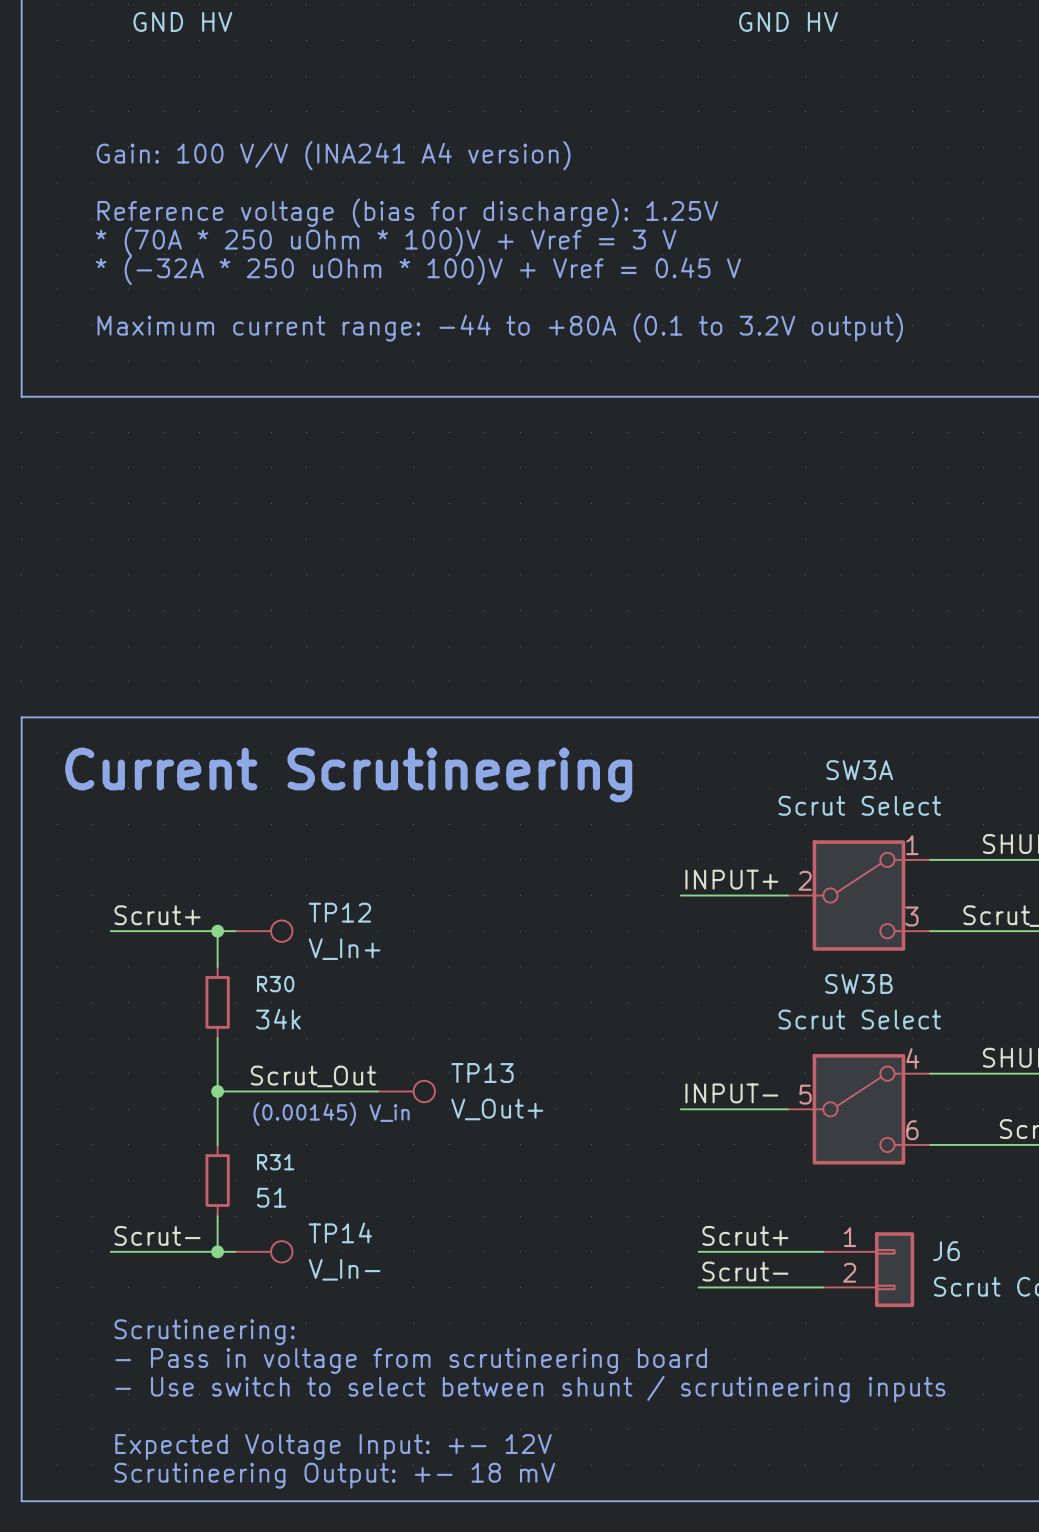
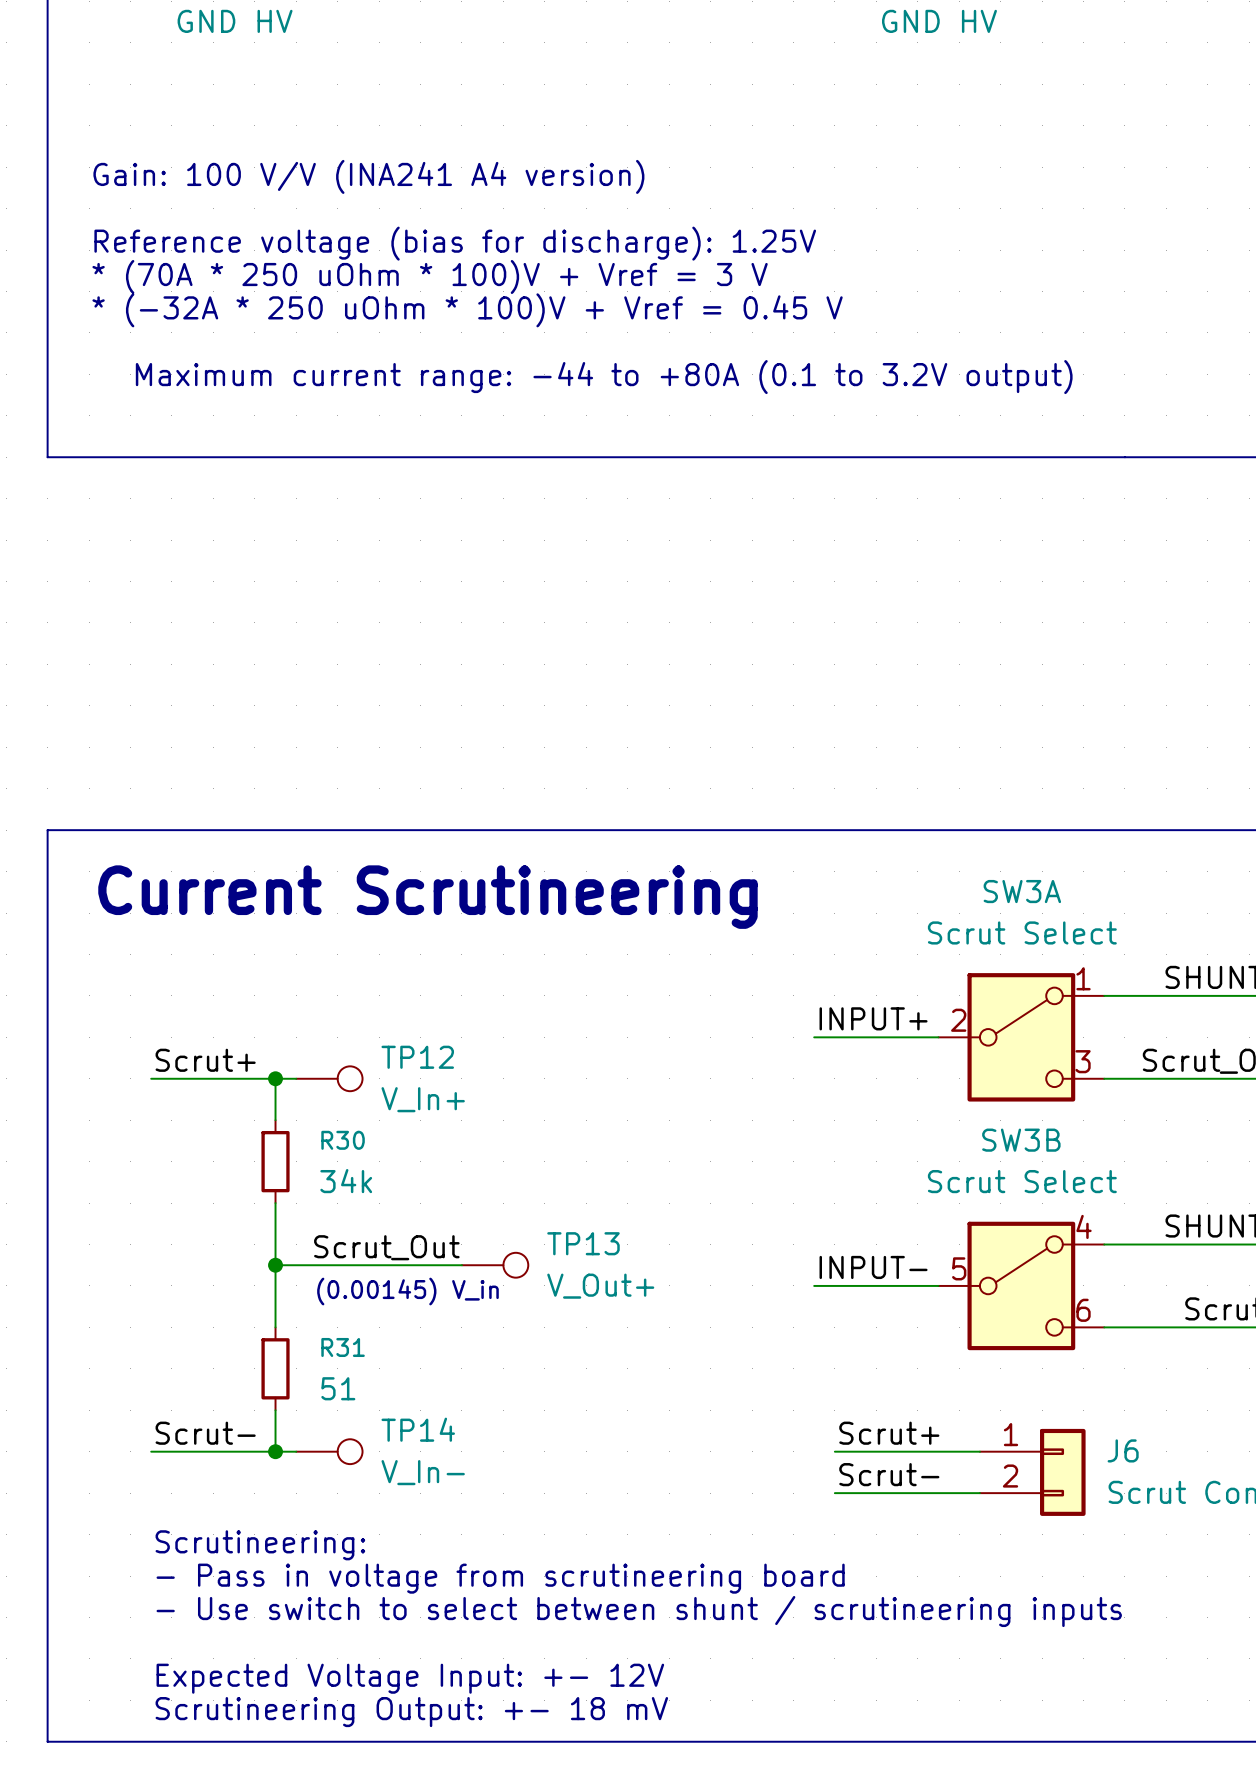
text position: Gain: 100 V/V (INA241 A4 version) (333, 155) -> Gain: 100 V/V (INA241 A4 version) (368, 176)
text position: Reference voltage (bias for discharge): 1.25V (407, 213) -> Reference voltage (bias for discharge): 1.25V (455, 243)
text position: * (70A * 250 uOhm * 100)V + Vref = 3 V (386, 241) -> * (70A * 250 uOhm * 100)V + Vref = 3 V (430, 276)
text position: * (-32A * 250 uOhm * 100)V + Vref = 0.45 V (418, 270) -> * (-32A * 250 uOhm * 100)V + Vref = 0.45 V (467, 310)

